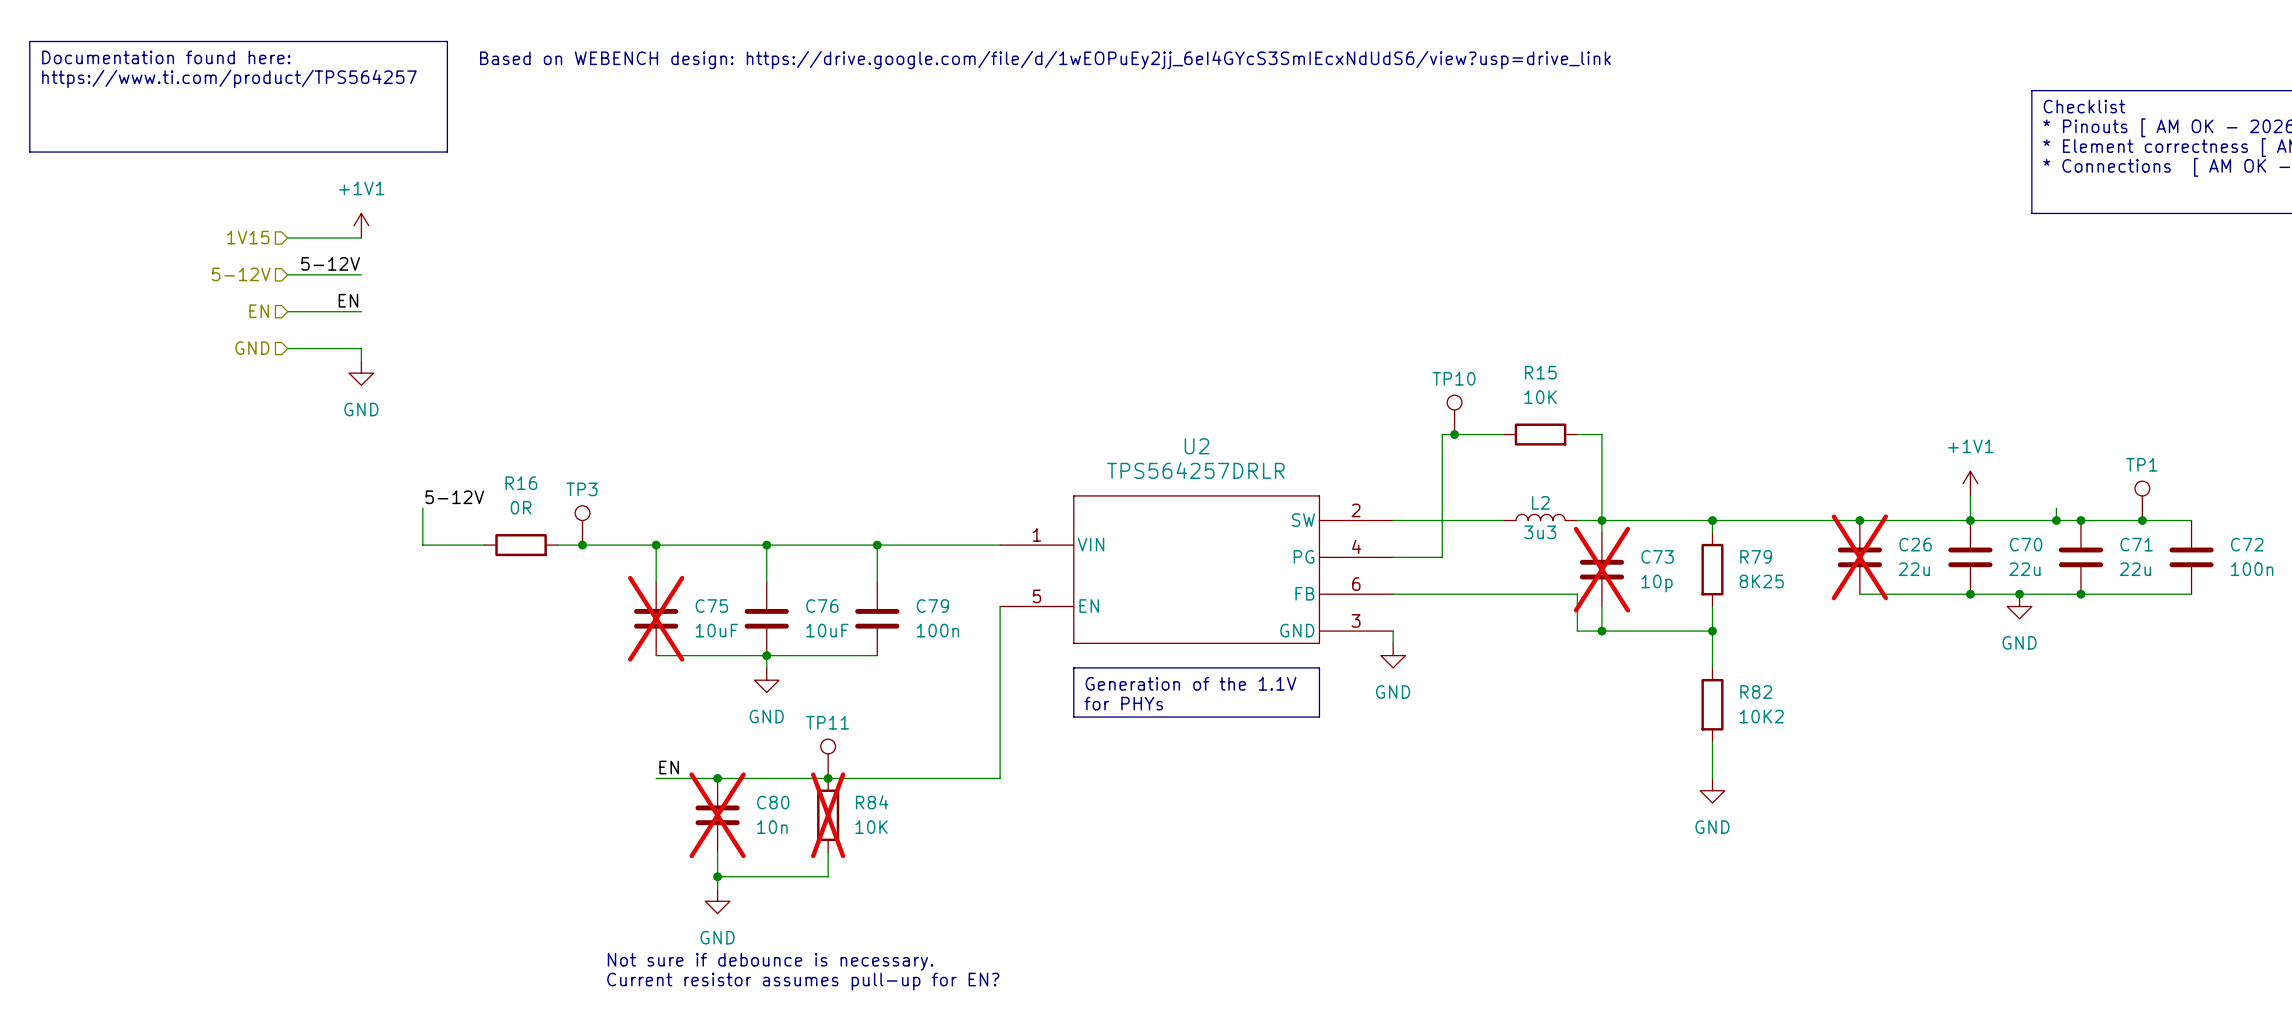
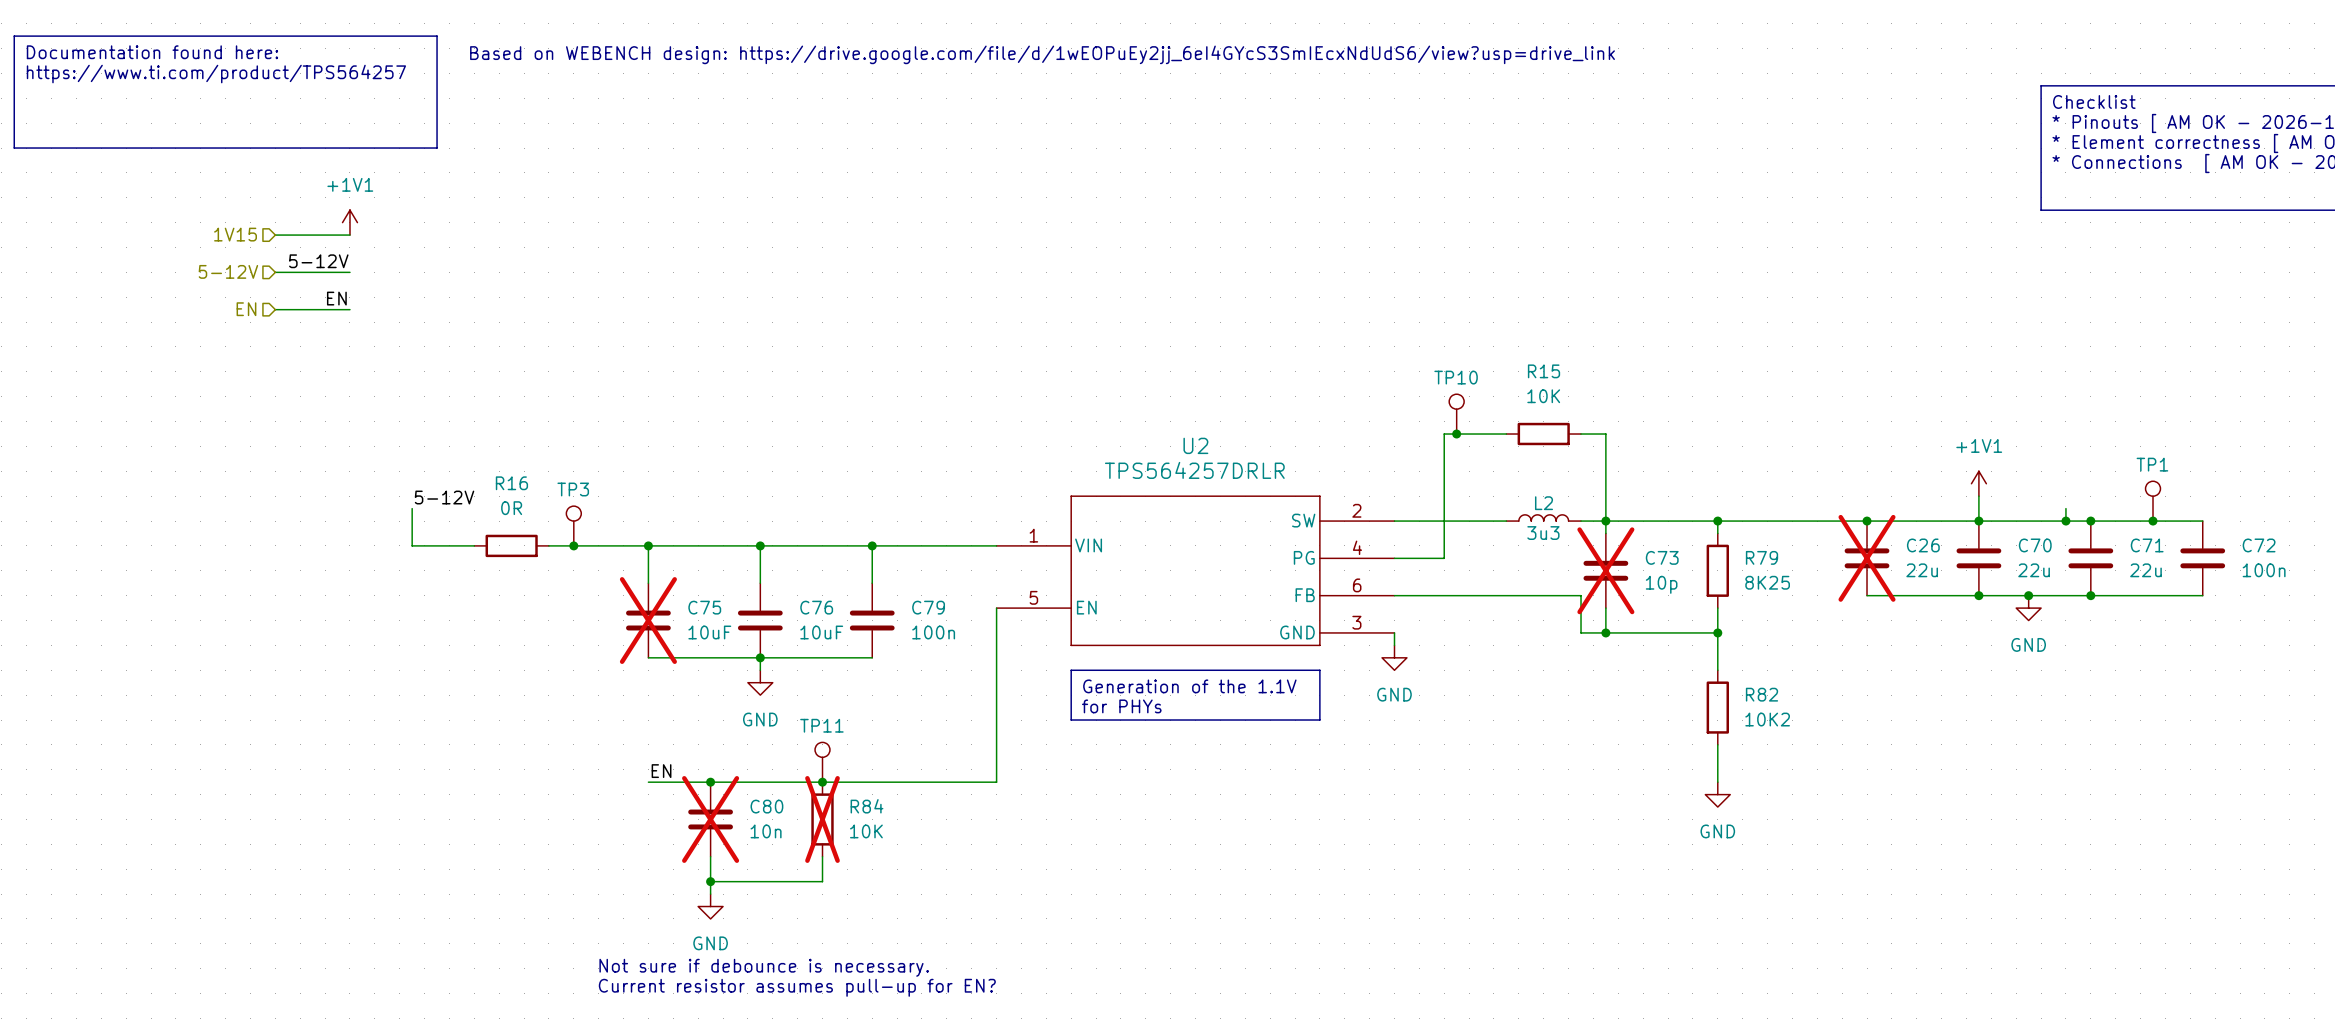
hierarchical label: GND (252, 348) -> none
wire: (287, 348) (361, 348) (361, 360) -> none
power symbol: GND (361, 373) -> none

